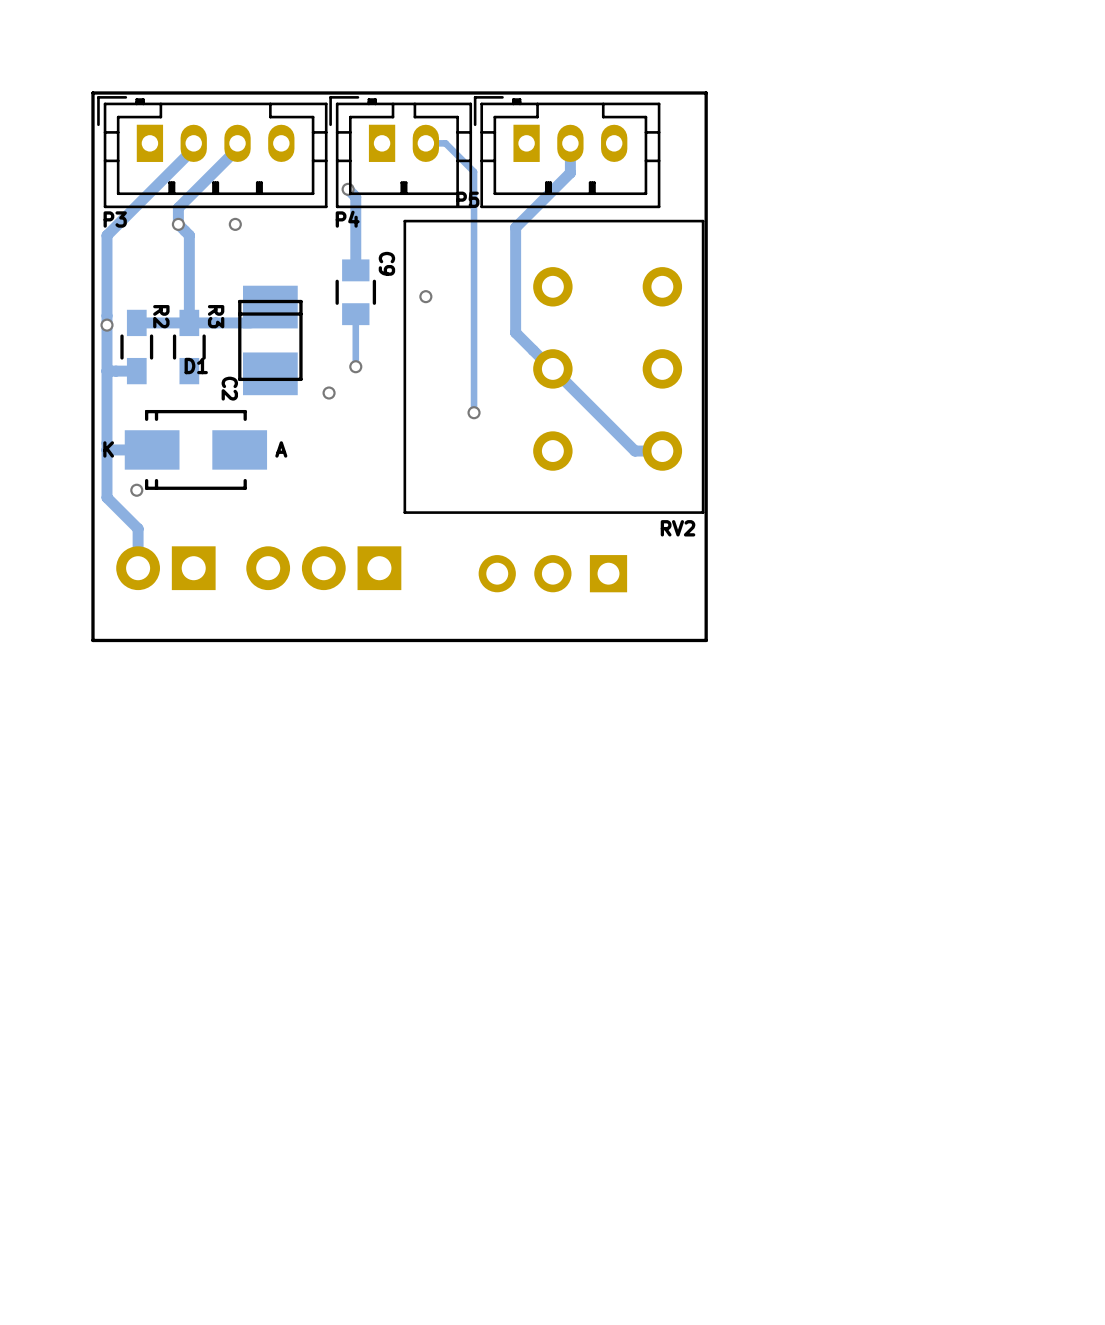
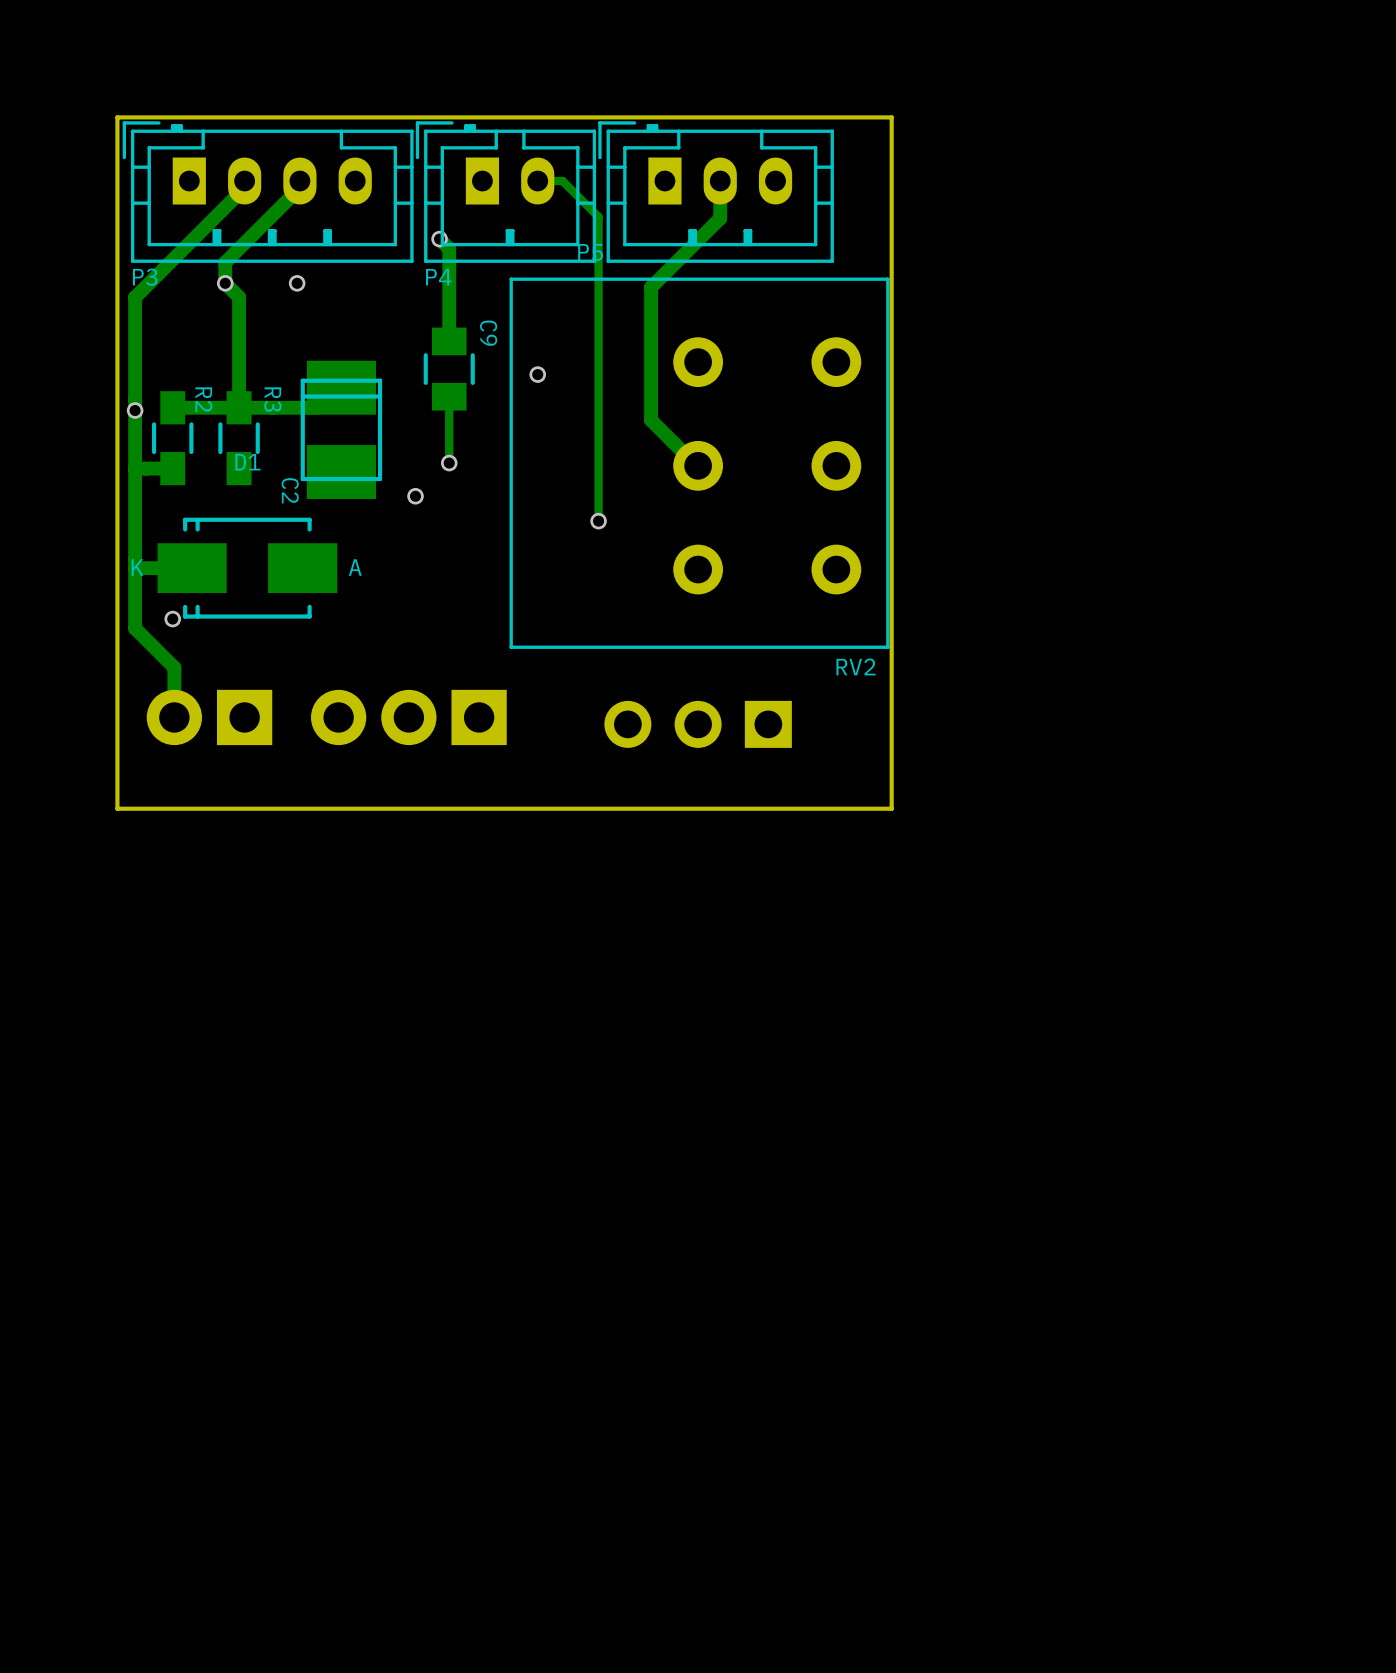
track: (552, 368) (634, 451) (662, 451) -> none

